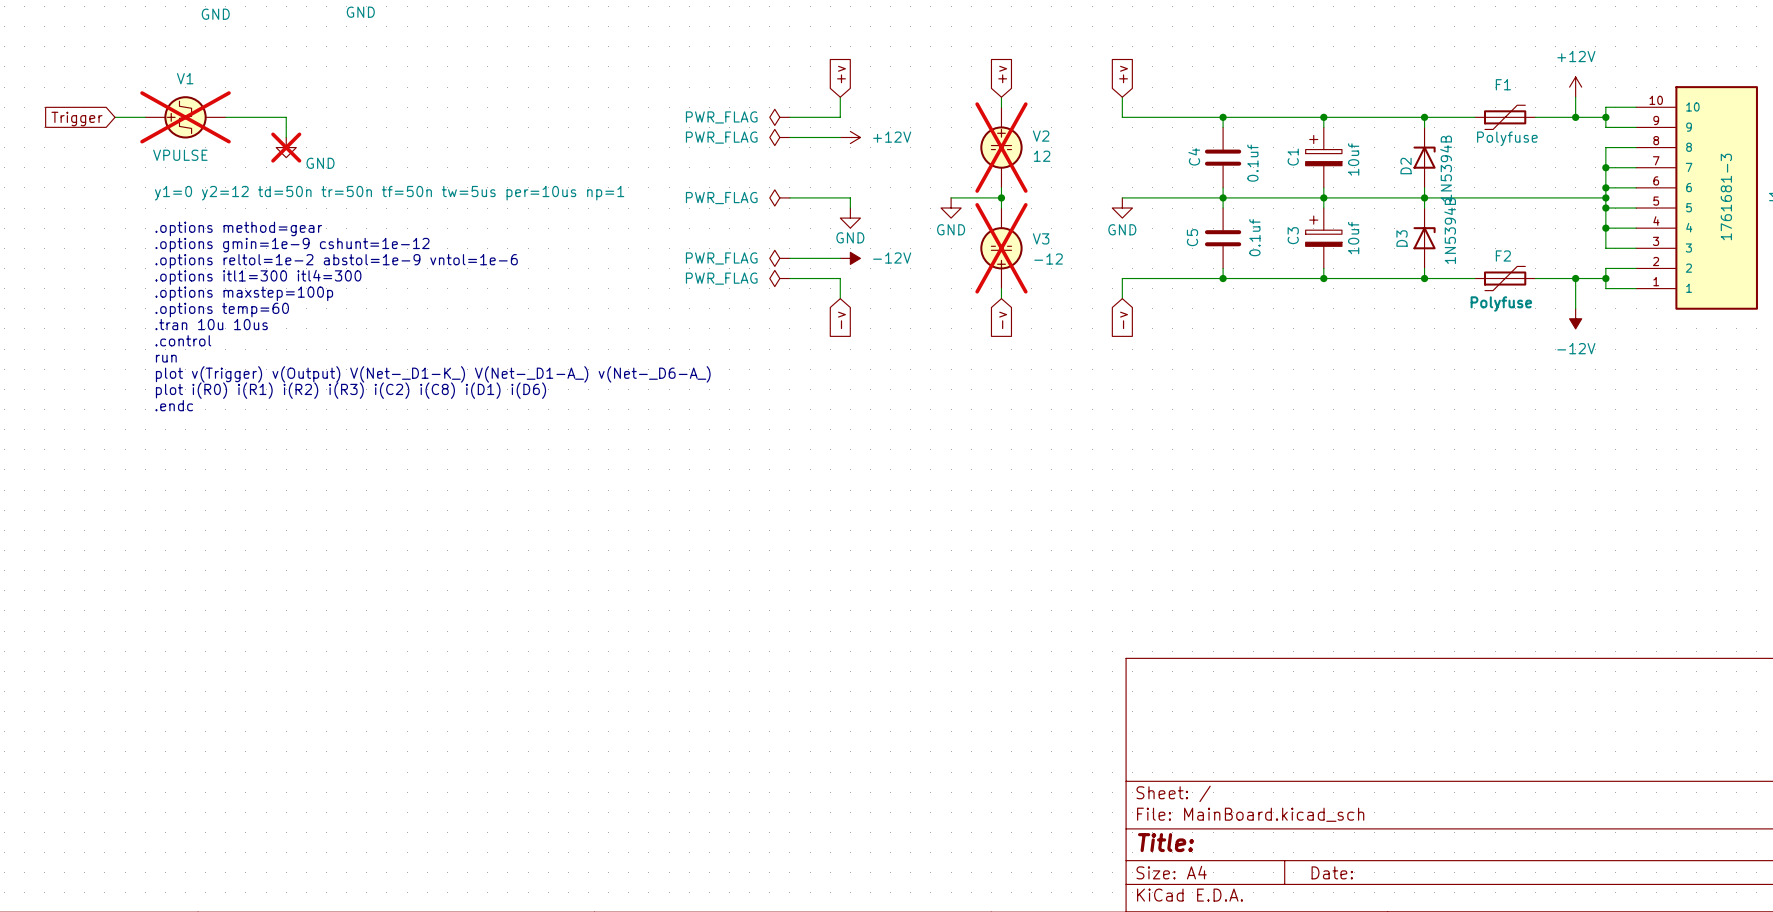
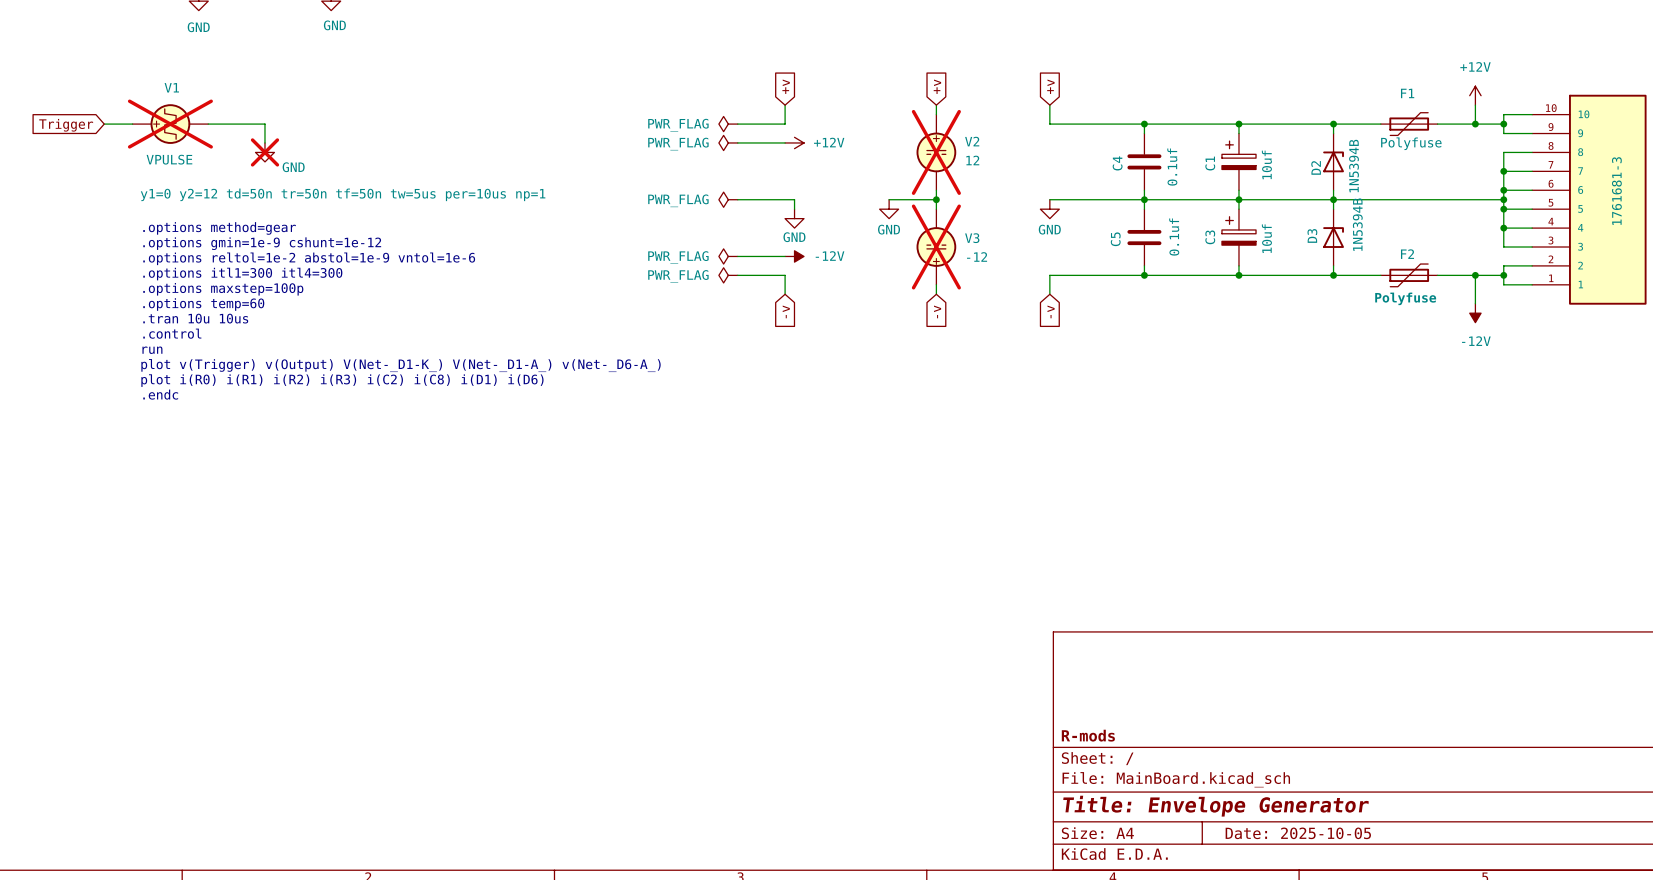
title block: none -> R-mods (1088, 735)
title block: Title: (1165, 842) -> Title: Envelope Generator (1216, 806)
title block: Date: (1332, 872) -> Date: 2025-10-05 (1298, 833)

